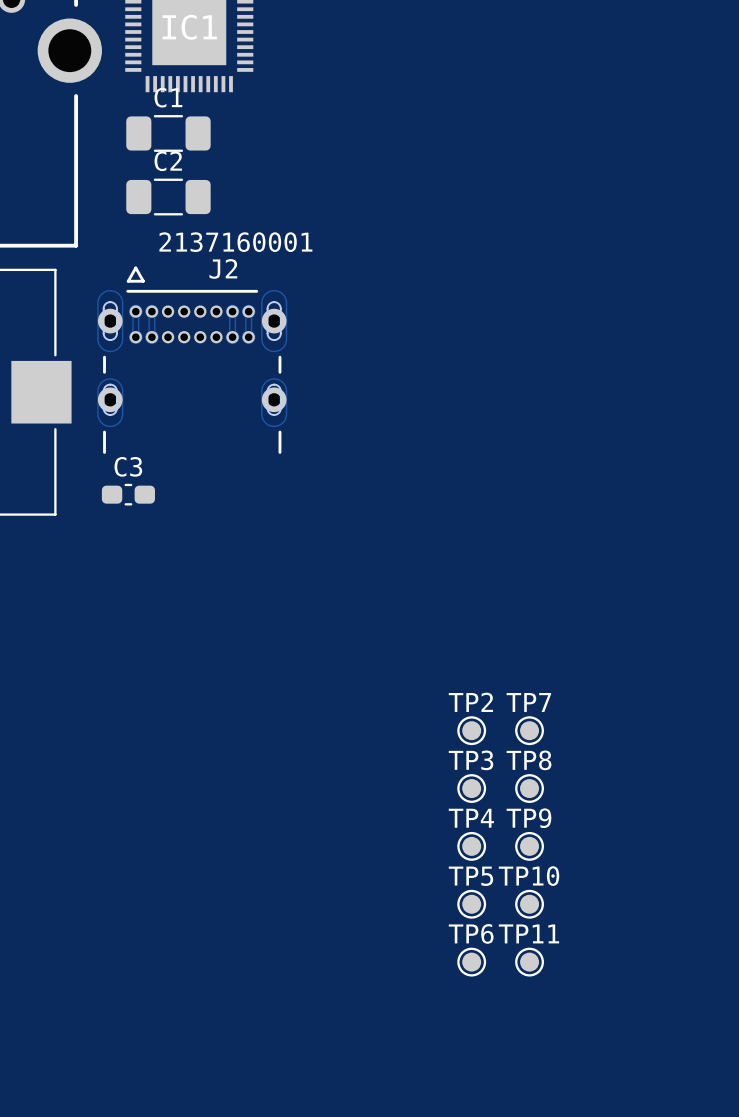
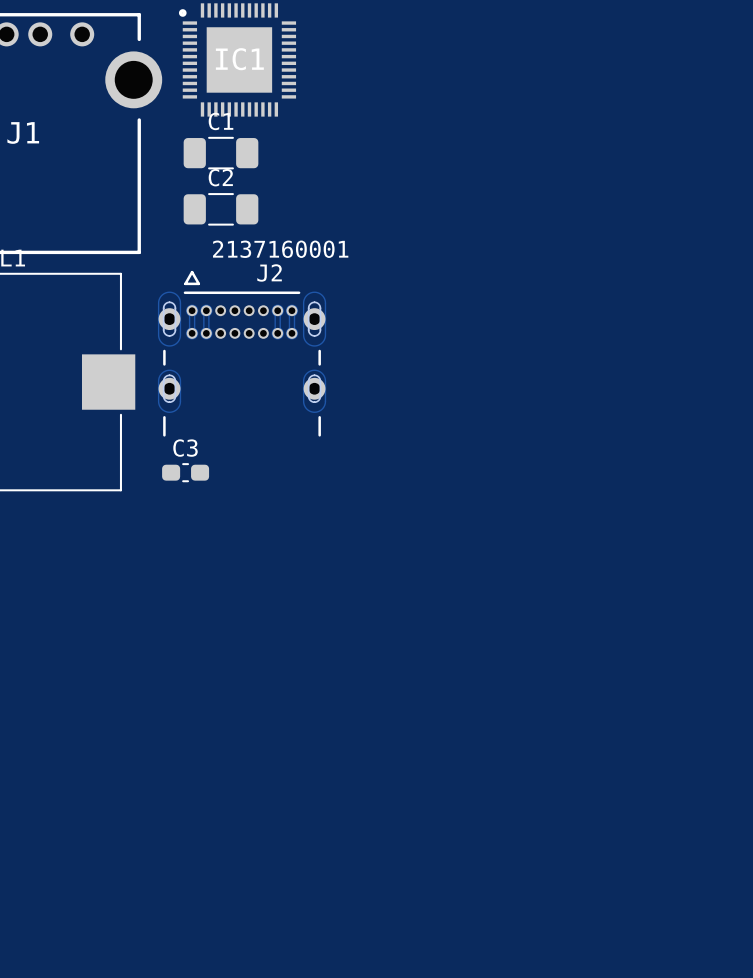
TP2: (471, 730) -> none
TP7: (529, 730) -> none
TP3: (471, 788) -> none
TP8: (529, 788) -> none
TP4: (471, 846) -> none
TP9: (529, 846) -> none
TP5: (471, 904) -> none
TP10: (529, 904) -> none
TP6: (471, 962) -> none
TP11: (529, 962) -> none

